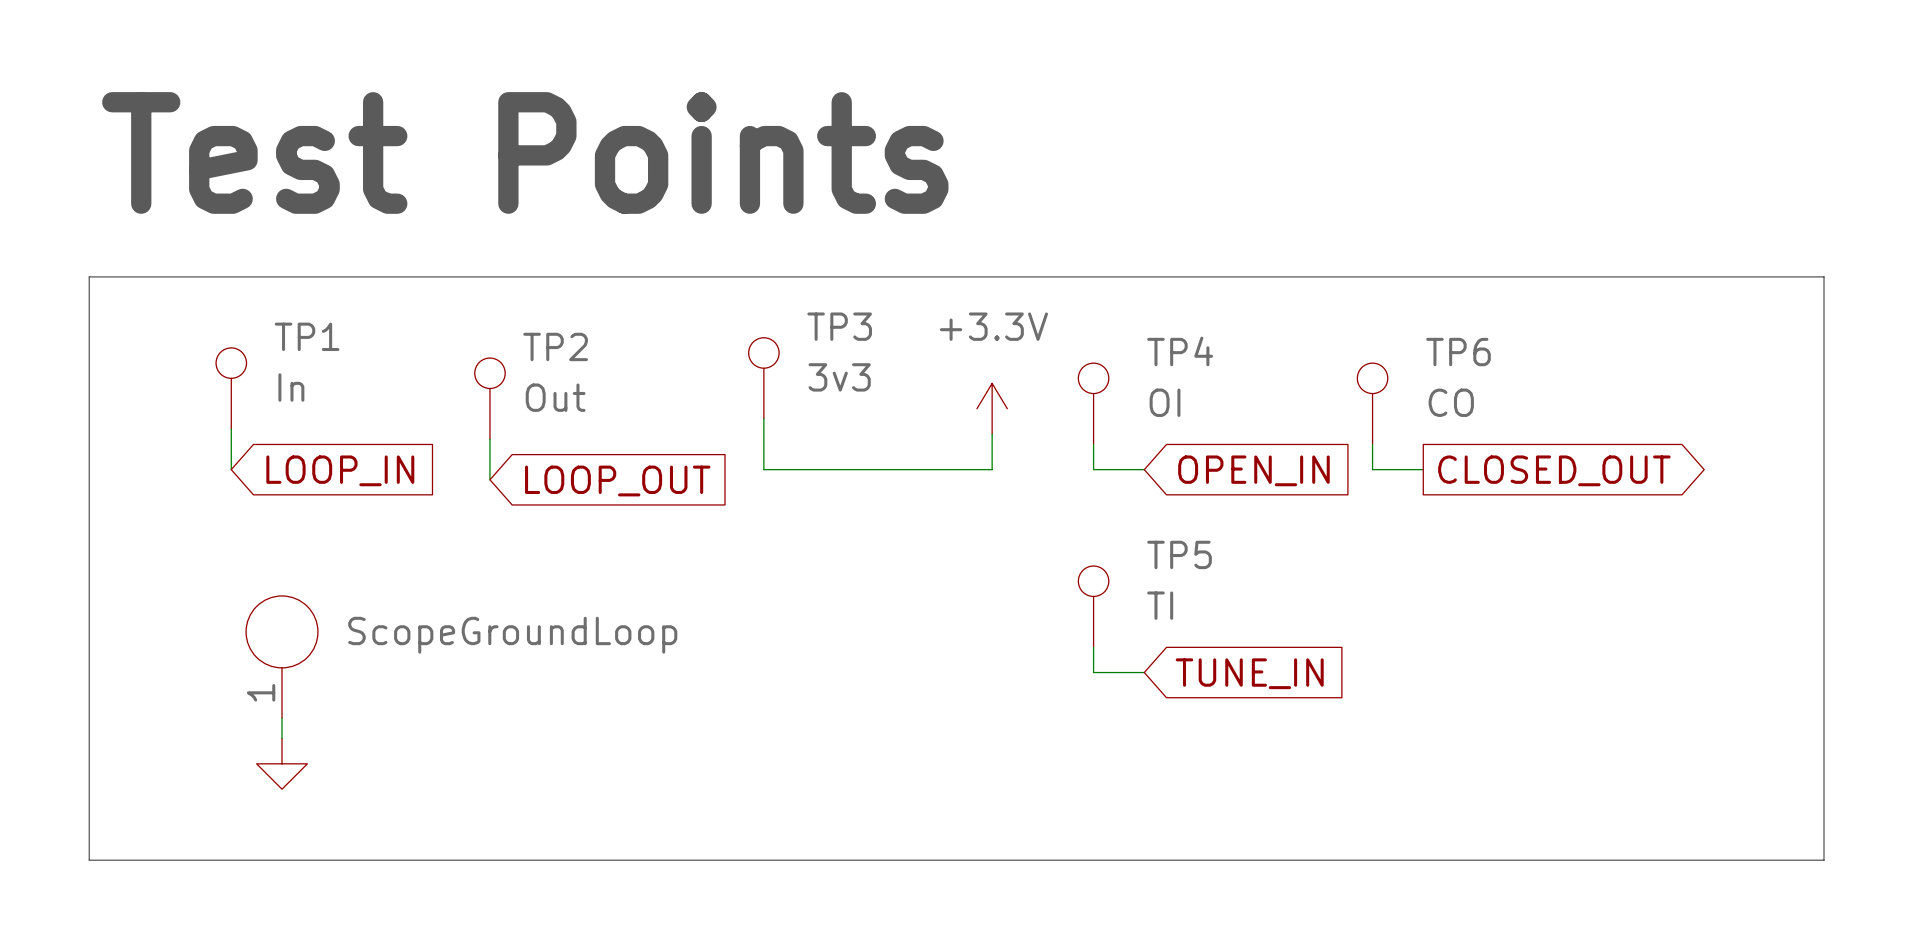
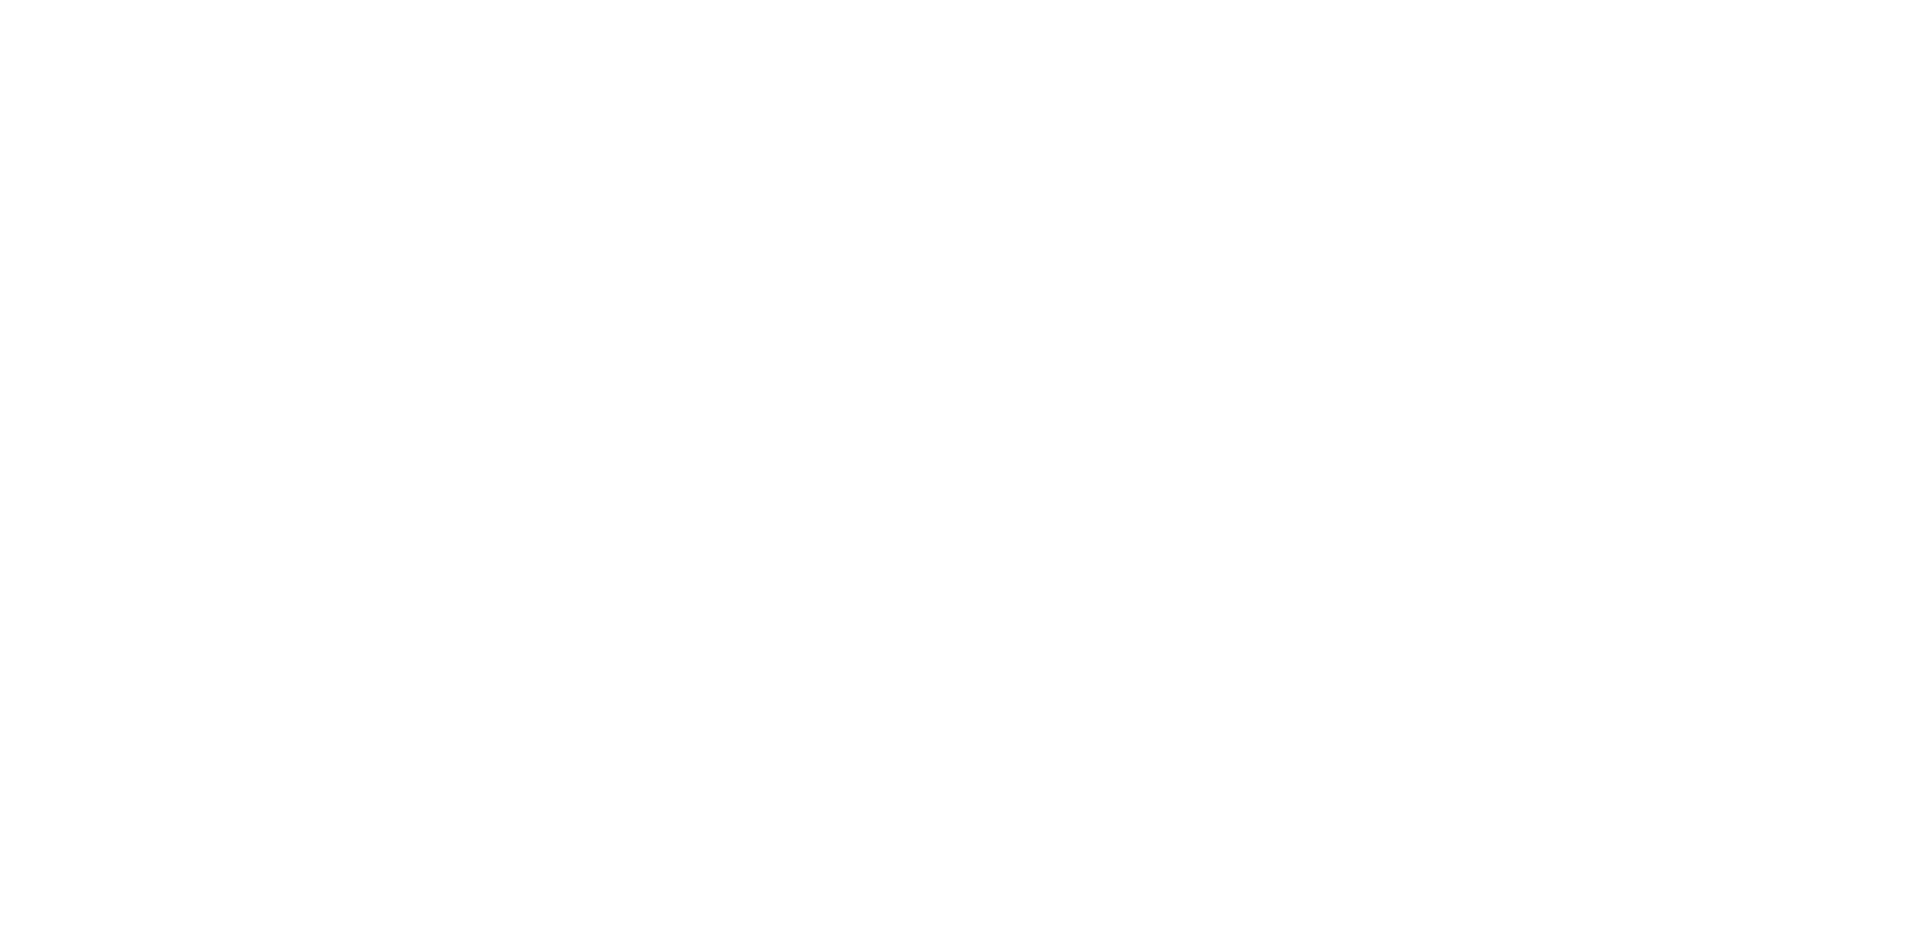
text: Test Points (525, 152) -> none
line: (89, 276) (1824, 276) (1824, 860) (89, 860) (89, 276) -> none
TP3: 3v3 (763, 378) -> none
TP1: In (231, 388) -> none
TP2: Out (489, 398) -> none
TP4: OI (1093, 403) -> none
TP6: CO (1372, 403) -> none
power symbol: +3.3V (992, 408) -> none
wire: (763, 418) (763, 469) (992, 469) (992, 434) -> none
wire: (231, 429) (231, 469) -> none
wire: (489, 439) (489, 479) -> none
wire: (1093, 444) (1093, 469) (1144, 469) -> none
wire: (1372, 444) (1372, 469) (1423, 469) -> none
global label: LOOP_IN (340, 470) -> none
global label: OPEN_IN (1253, 470) -> none
global label: CLOSED_OUT (1554, 470) -> none
global label: LOOP_OUT (617, 481) -> none
TP5: TI (1093, 606) -> none
wire: (1093, 647) (1093, 672) (1144, 672) -> none
part: ScopeGroundLoop (282, 657) -> none
global label: TUNE_IN (1249, 673) -> none
wire: (282, 718) (282, 738) -> none
power symbol: (282, 763) -> none

